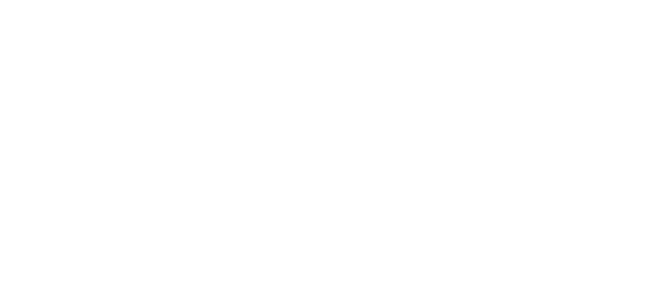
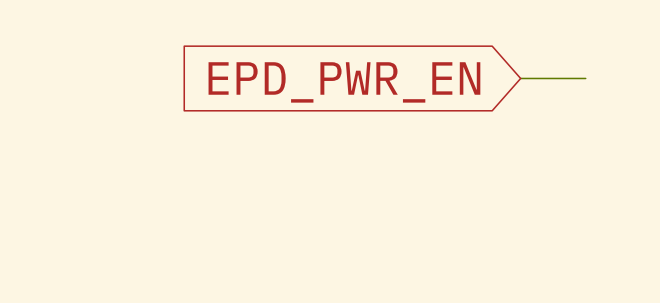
wire: none -> (520, 78) (585, 78)
global label: none -> EPD_PWR_EN (344, 82)

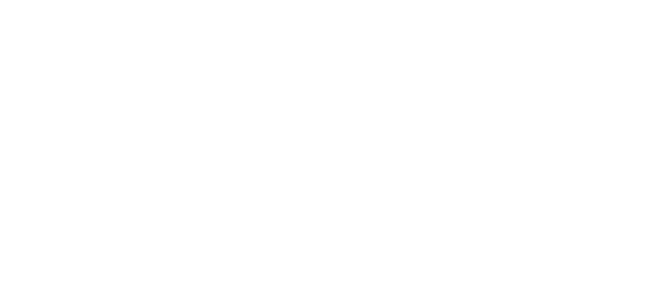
wire: (520, 78) (585, 78) -> none
global label: EPD_PWR_EN (344, 82) -> none

